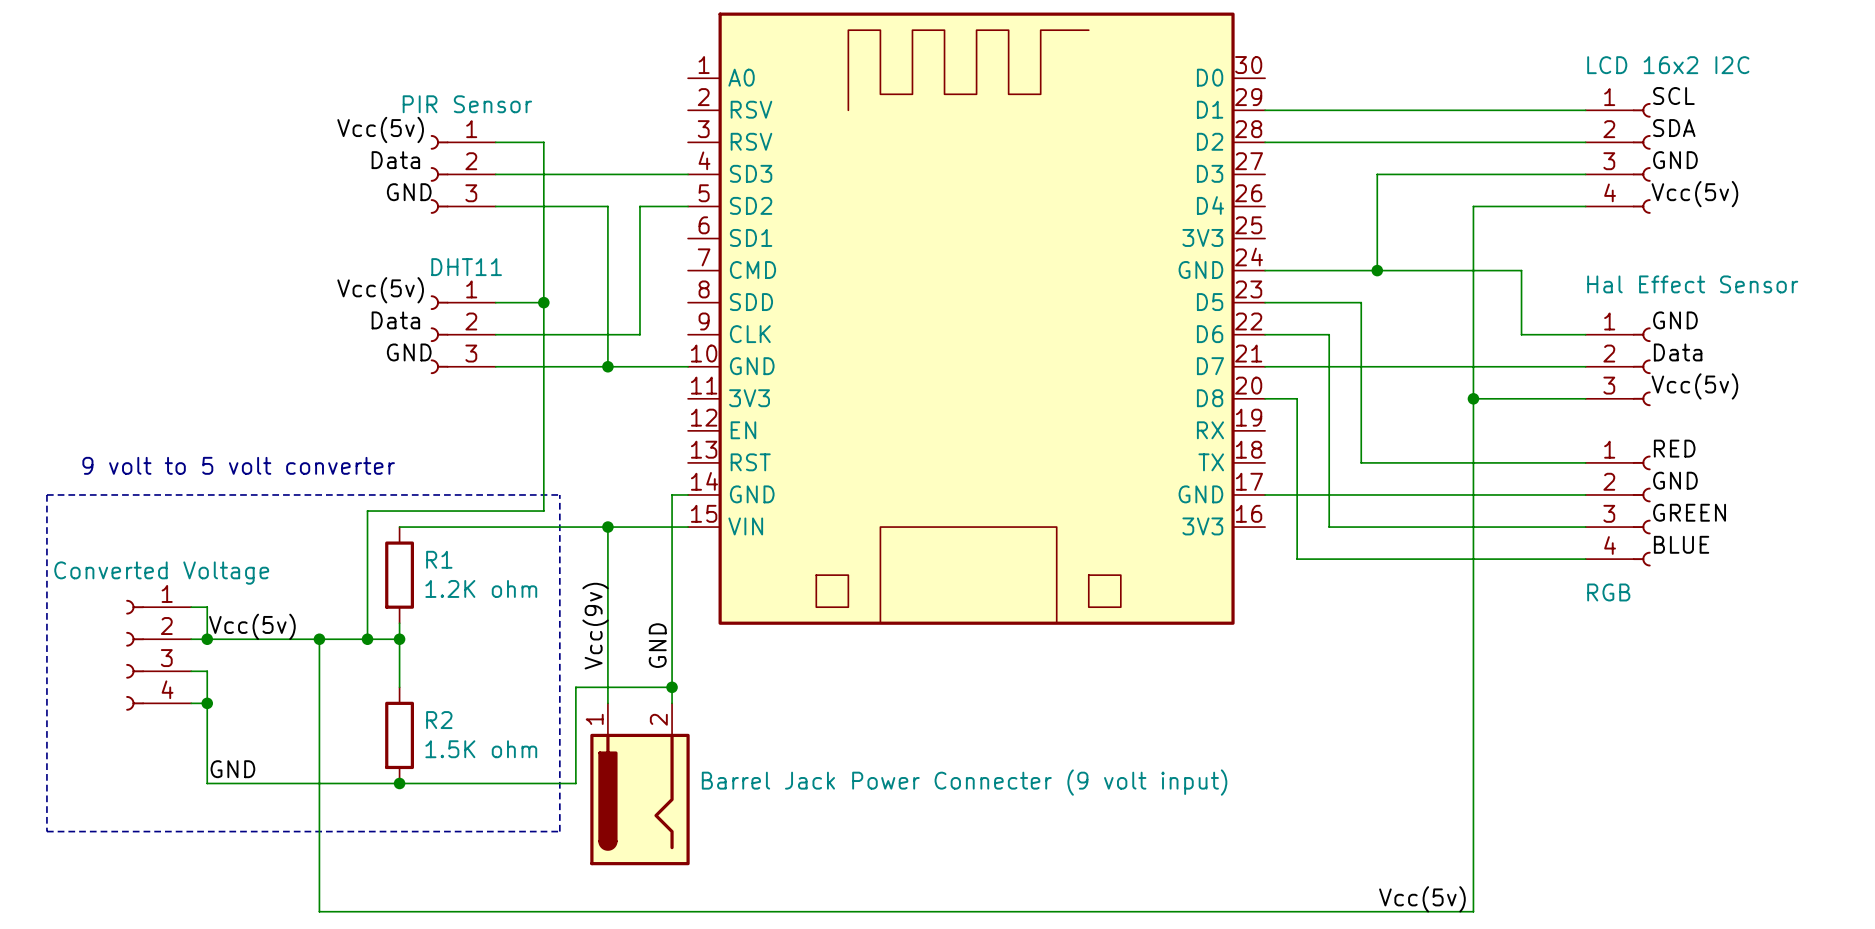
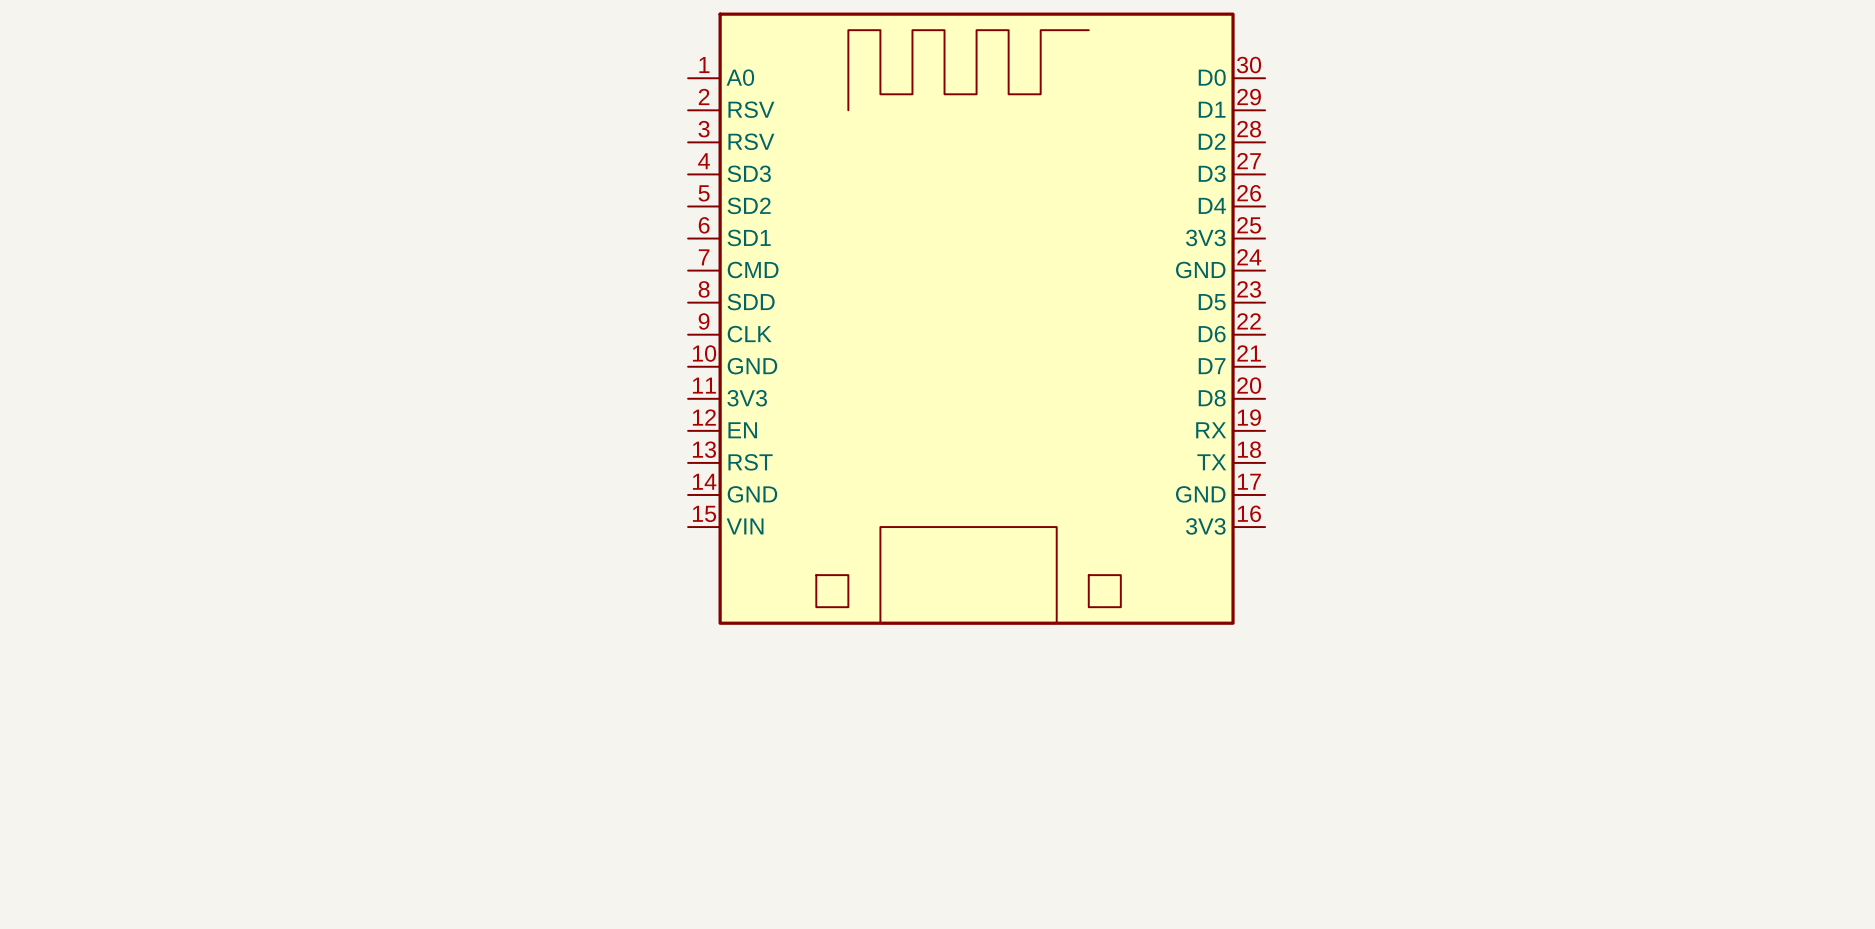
label: SCL (1673, 96) -> none
wire: (1265, 110) (1585, 110) -> none
label: SDA (1674, 128) -> none
label: Vcc(5v) (380, 129) -> none
wire: (495, 142) (543, 142) (543, 511) (367, 511) (367, 639) -> none
wire: (1265, 142) (1585, 142) -> none
part: LCD 16x2 I2C (1618, 158) -> none
label: Data (395, 160) -> none
label: GND (1675, 160) -> none
part: PIR Sensor (463, 174) -> none
wire: (495, 174) (688, 174) -> none
wire: (1585, 174) (1377, 174) (1377, 270) -> none
label: GND (409, 192) -> none
label: Vcc(5v) (1694, 194) -> none
wire: (495, 206) (607, 206) (607, 366) -> none
wire: (688, 206) (639, 206) (639, 334) (495, 334) -> none
wire: (1585, 206) (1473, 206) (1473, 911) (319, 911) (319, 639) -> none
wire: (1265, 270) (1521, 270) (1521, 334) (1585, 334) -> none
junction: (1377, 270) -> none
label: Vcc(5v) (380, 290) -> none
wire: (495, 302) (543, 302) -> none
junction: (543, 302) -> none
wire: (1265, 302) (1361, 302) (1361, 462) (1585, 462) -> none
label: Data (395, 320) -> none
label: GND (1675, 320) -> none
part: DHT11 (463, 334) -> none
wire: (1265, 334) (1329, 334) (1329, 527) (1585, 527) -> none
label: GND (409, 352) -> none
label: Data (1678, 352) -> none
wire: (495, 366) (688, 366) -> none
junction: (607, 366) -> none
wire: (1265, 366) (1585, 366) -> none
part: Hal Effect Sensor (1618, 366) -> none
label: Vcc(5v) (1694, 386) -> none
wire: (1265, 398) (1297, 398) (1297, 559) (1585, 559) -> none
wire: (1473, 398) (1585, 398) -> none
junction: (1473, 398) -> none
label: RED (1674, 448) -> none
text: 9 volt to 5 volt converter (238, 465) -> none
label: GND (1675, 480) -> none
line: (46, 494) (46, 831) (559, 831) (559, 494) (46, 494) -> none
wire: (688, 494) (672, 494) (672, 703) -> none
wire: (1265, 494) (1585, 494) -> none
part: RGB (1618, 511) -> none
label: GREEN (1689, 512) -> none
wire: (399, 527) (688, 527) -> none
wire: (607, 527) (607, 703) -> none
junction: (607, 527) -> none
label: BLUE (1681, 544) -> none
R1: 1.2K ohm (399, 575) -> none
wire: (191, 607) (207, 607) (207, 639) -> none
wire: (399, 623) (399, 687) -> none
label: Vcc(5v) (252, 626) -> none
label: Vcc(9v) (595, 626) -> none
wire: (191, 639) (399, 639) -> none
junction: (207, 639) -> none
junction: (319, 639) -> none
junction: (367, 639) -> none
junction: (399, 639) -> none
label: GND (657, 645) -> none
part: Converted Voltage (158, 655) -> none
wire: (191, 671) (207, 671) (207, 783) (575, 783) (575, 687) (672, 687) -> none
junction: (672, 687) -> none
wire: (191, 703) (207, 703) -> none
junction: (207, 703) -> none
R2: 1.5K ohm (399, 735) -> none
label: GND (232, 769) -> none
junction: (399, 783) -> none
part: Barrel Jack Power Connecter (9 volt input) (639, 784) -> none
label: Vcc(5v) (1422, 899) -> none

